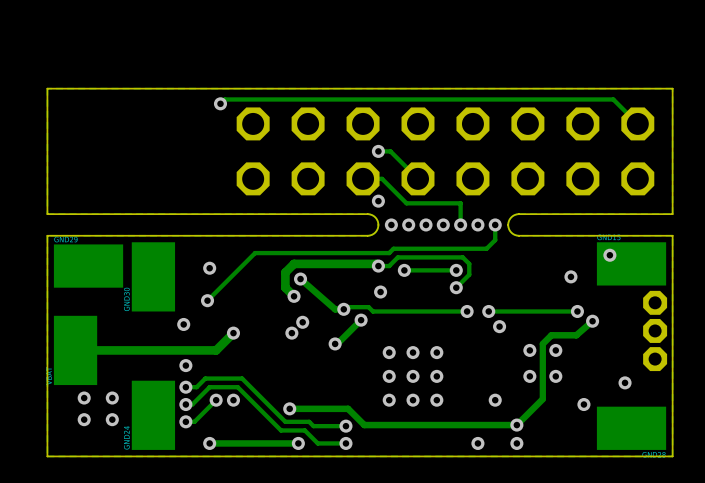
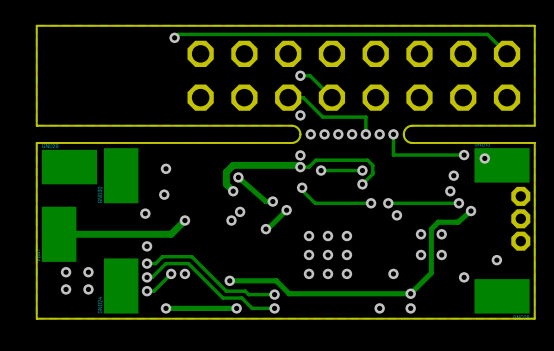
track: (495, 240) (486, 248) (393, 248) (389, 253) (255, 253) (207, 300) -> (393, 146) (393, 155) (464, 155)
via: none -> (464, 155)
via: none -> (300, 155)
via: none -> (450, 191)
track: (343, 309) (345, 307) (368, 307) (373, 311) (396, 311) -> (300, 189) (315, 203)

